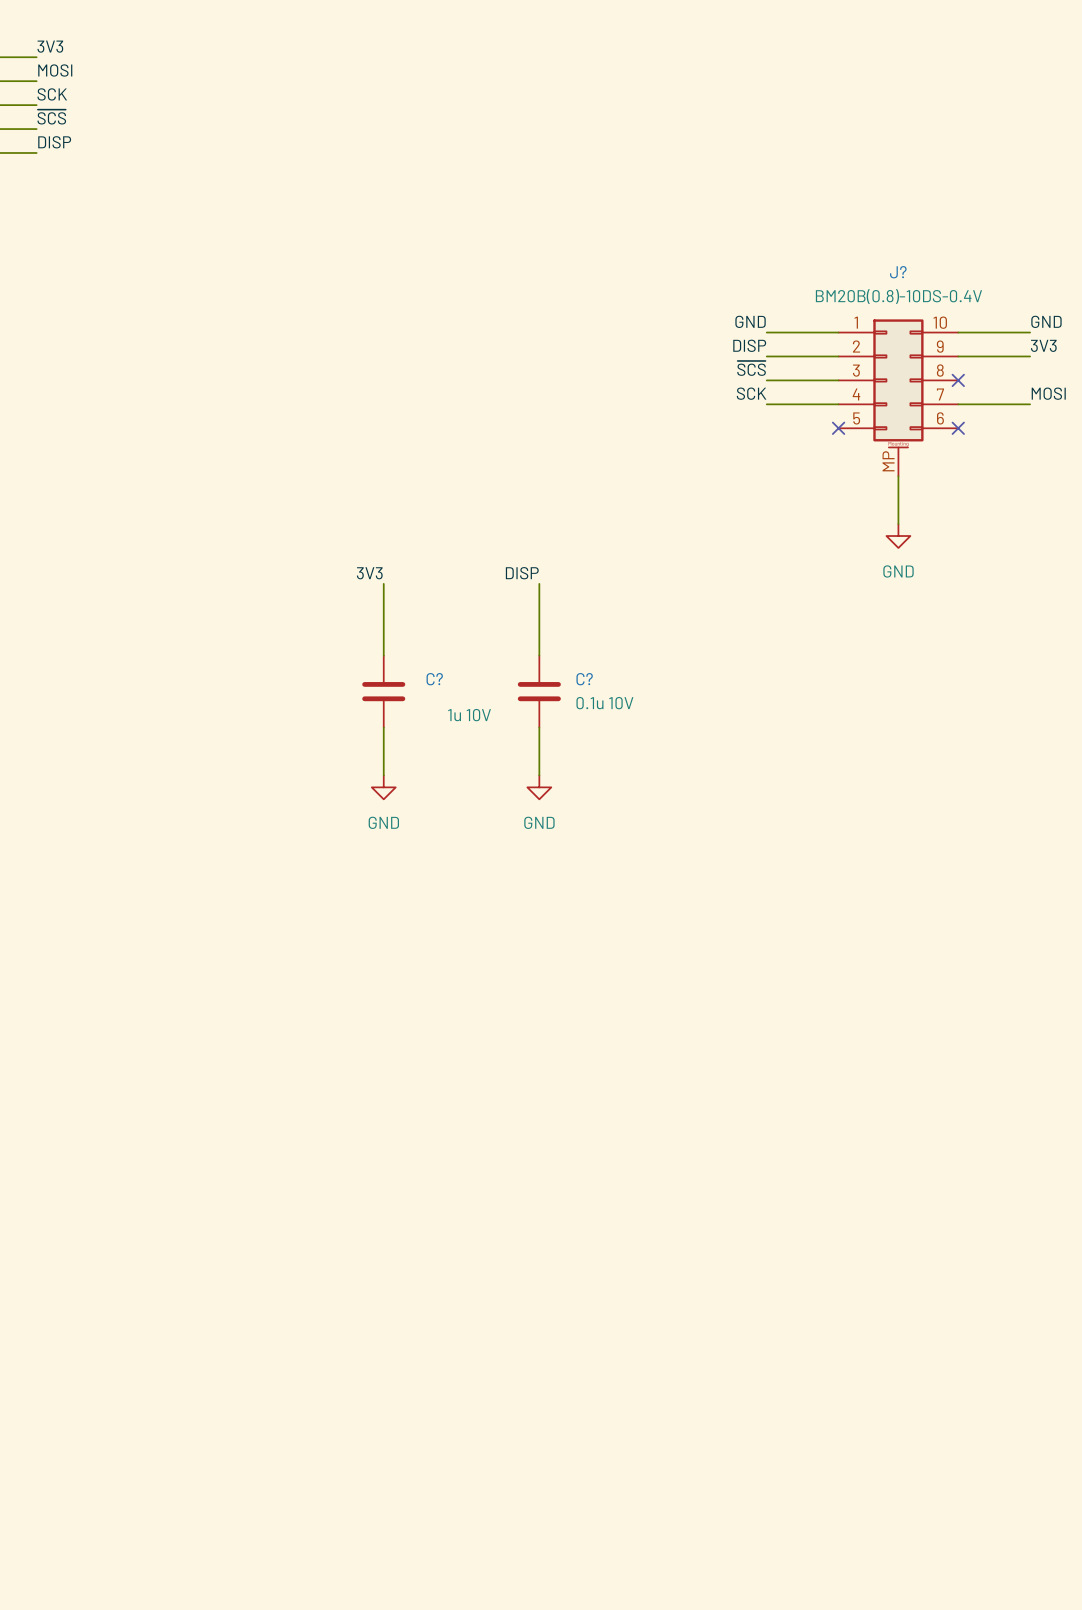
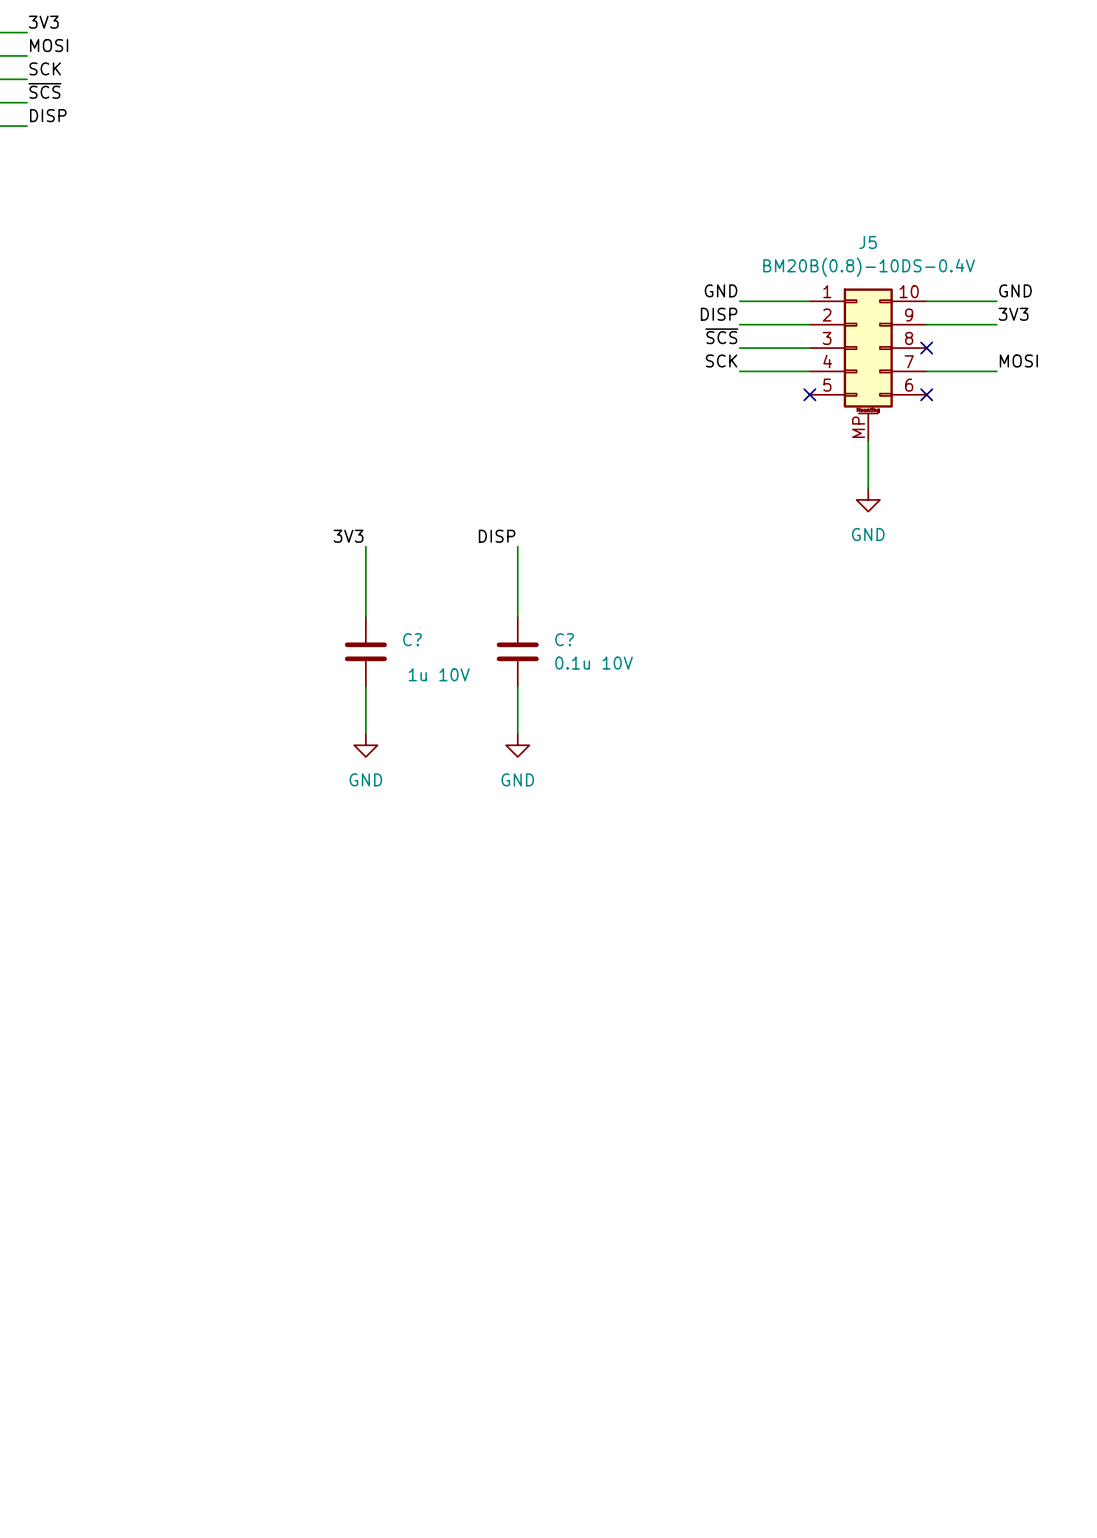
J? name: J? (898, 272) -> J5 (867, 242)

